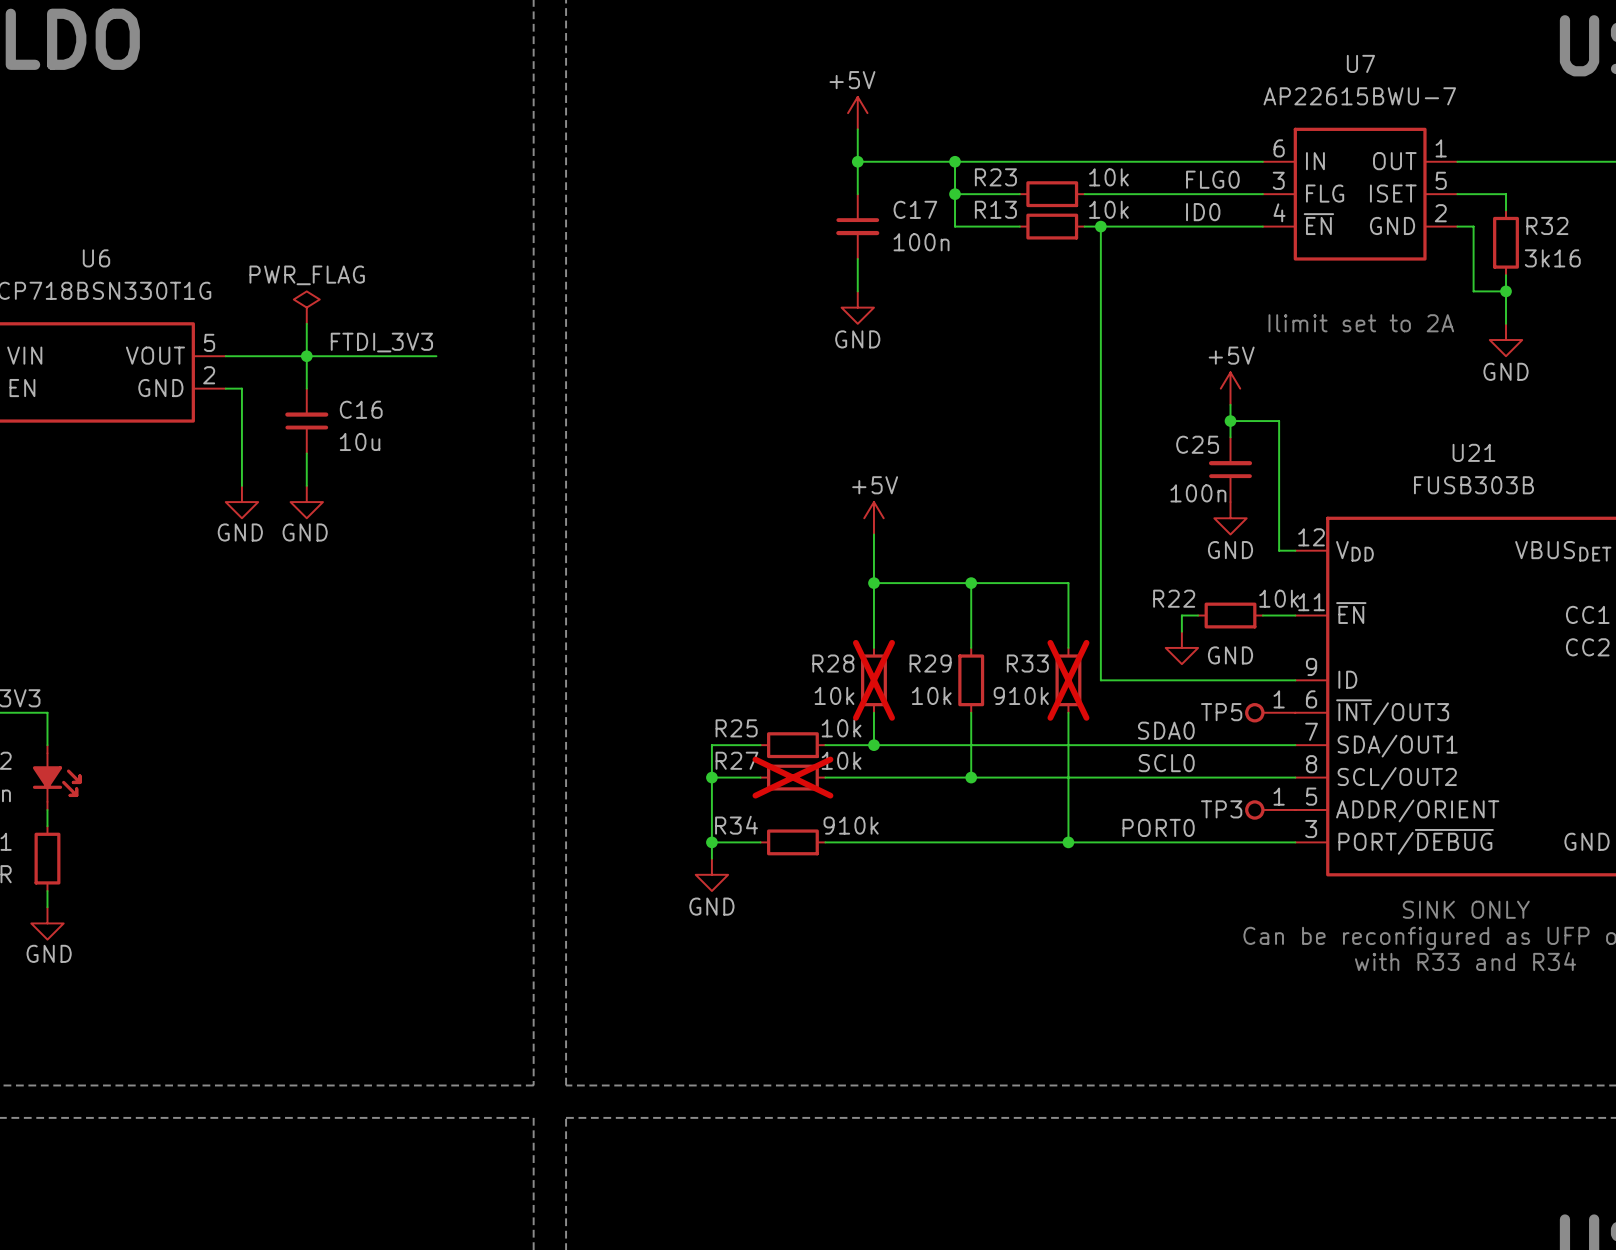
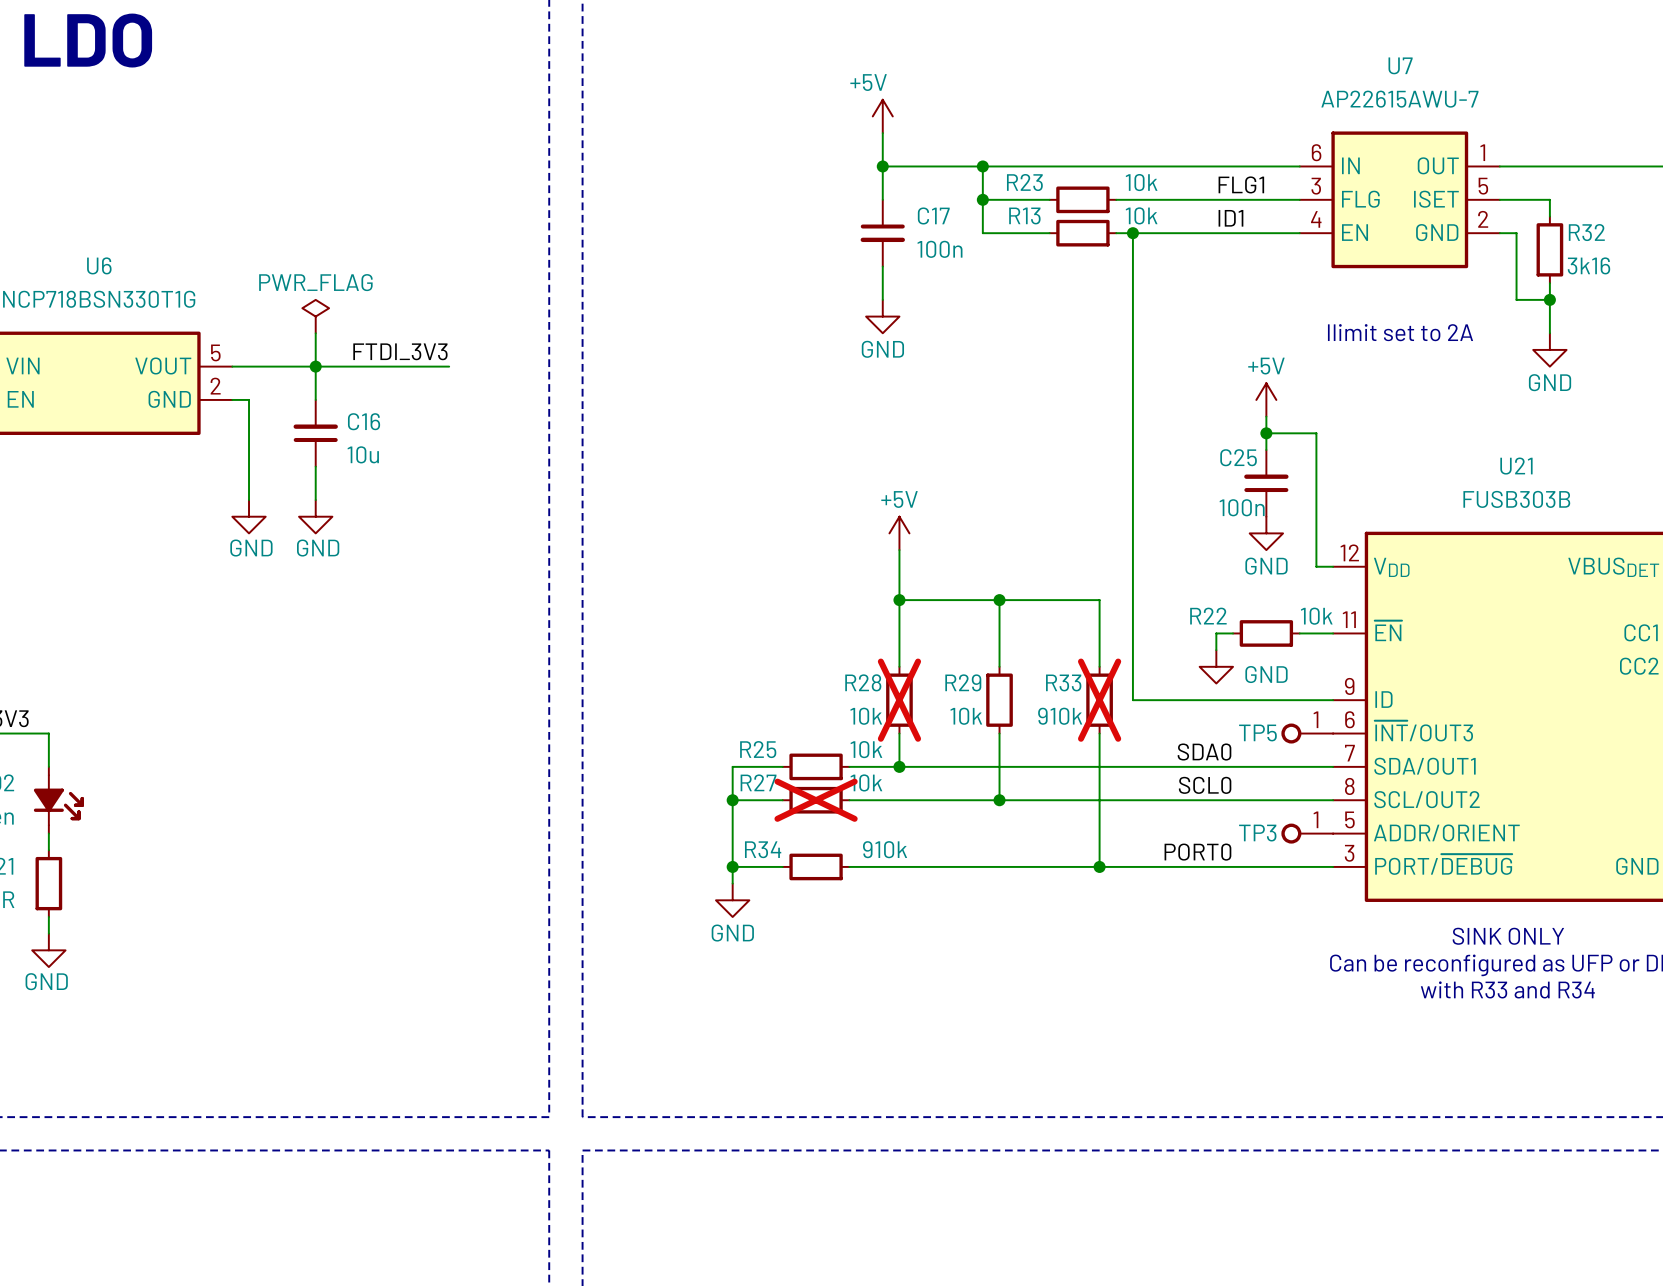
U7 text: AP22615BWU-7 (1359, 96) -> AP22615AWU-7 (1399, 99)
label: FLG0 (1212, 179) -> FLG1 (1241, 184)
label: ID0 (1203, 212) -> ID1 (1230, 218)
U7 pin name: ~{EN} (1318, 224) -> EN (1355, 232)

